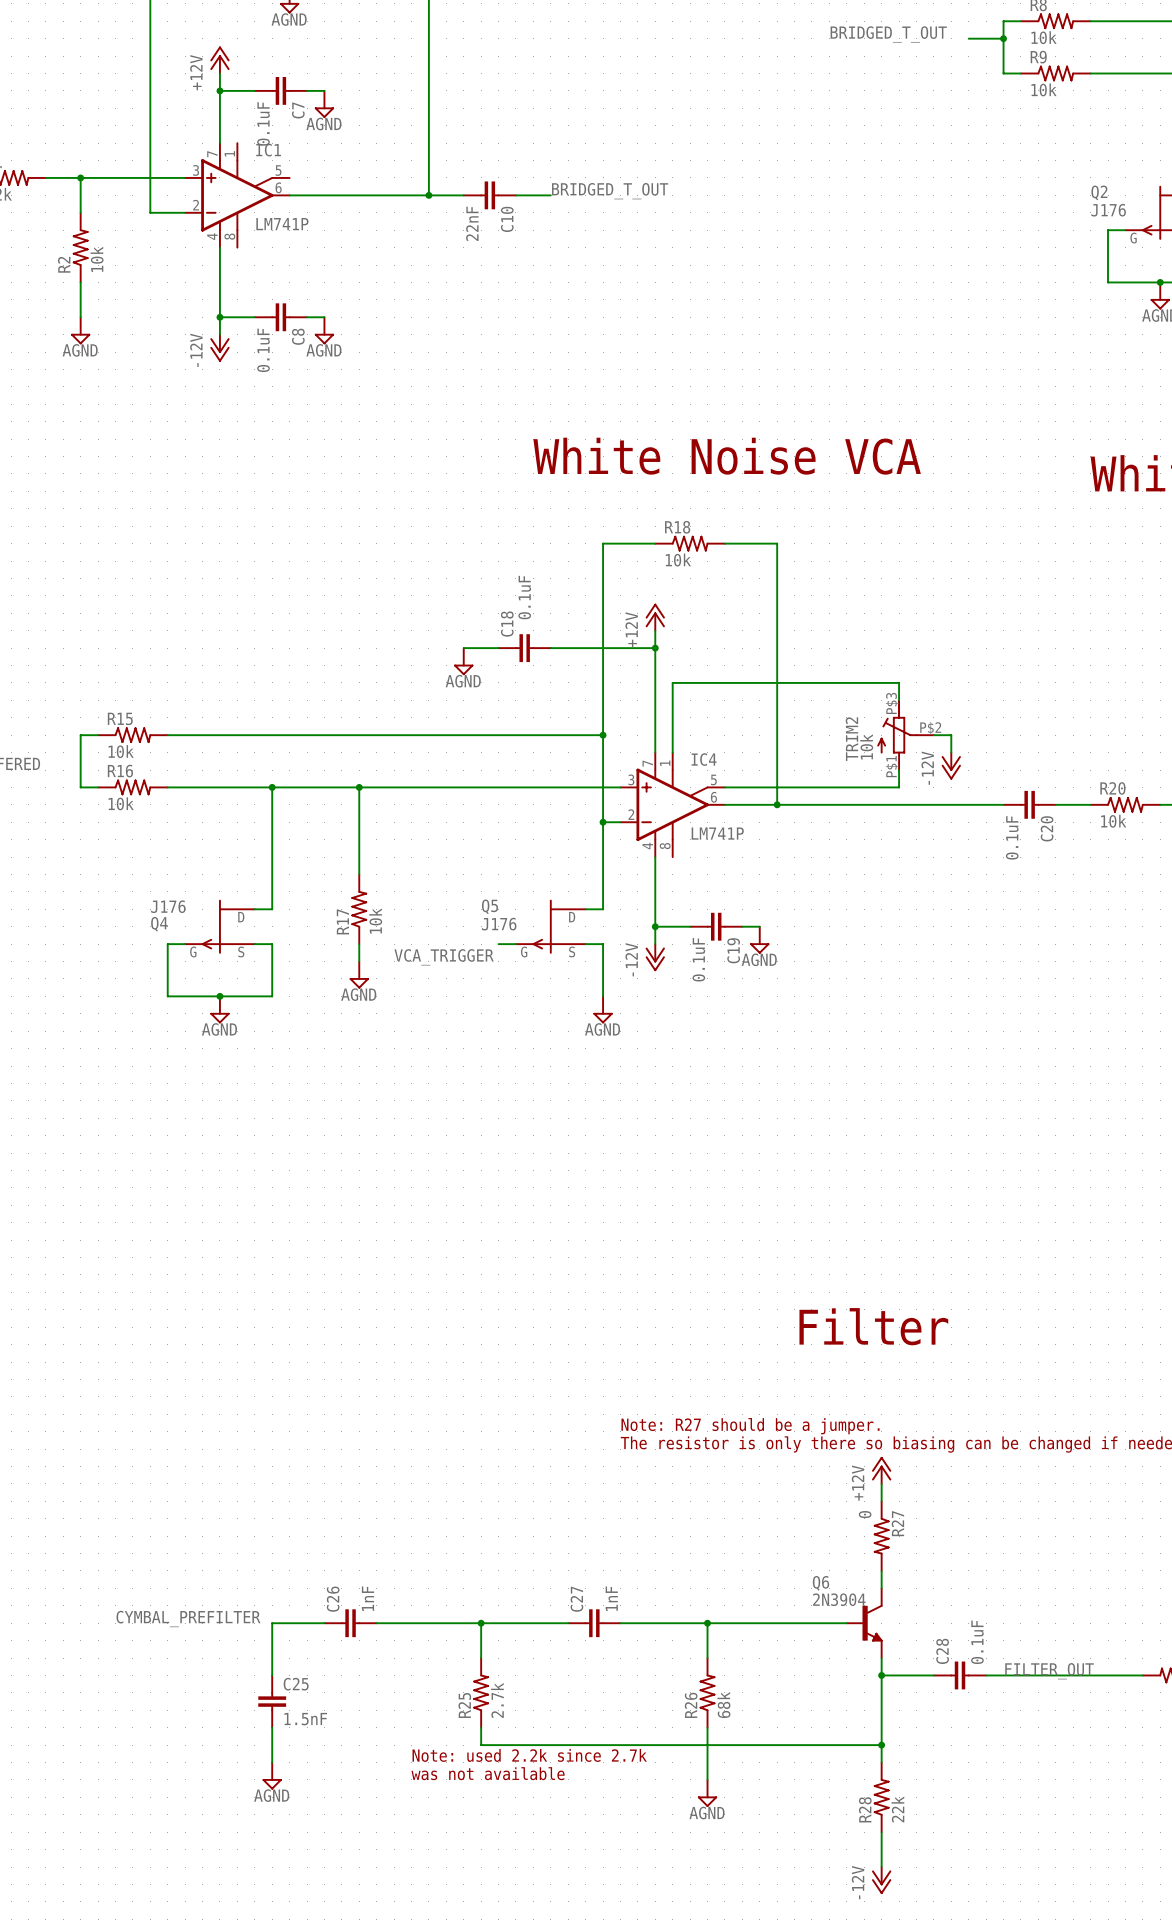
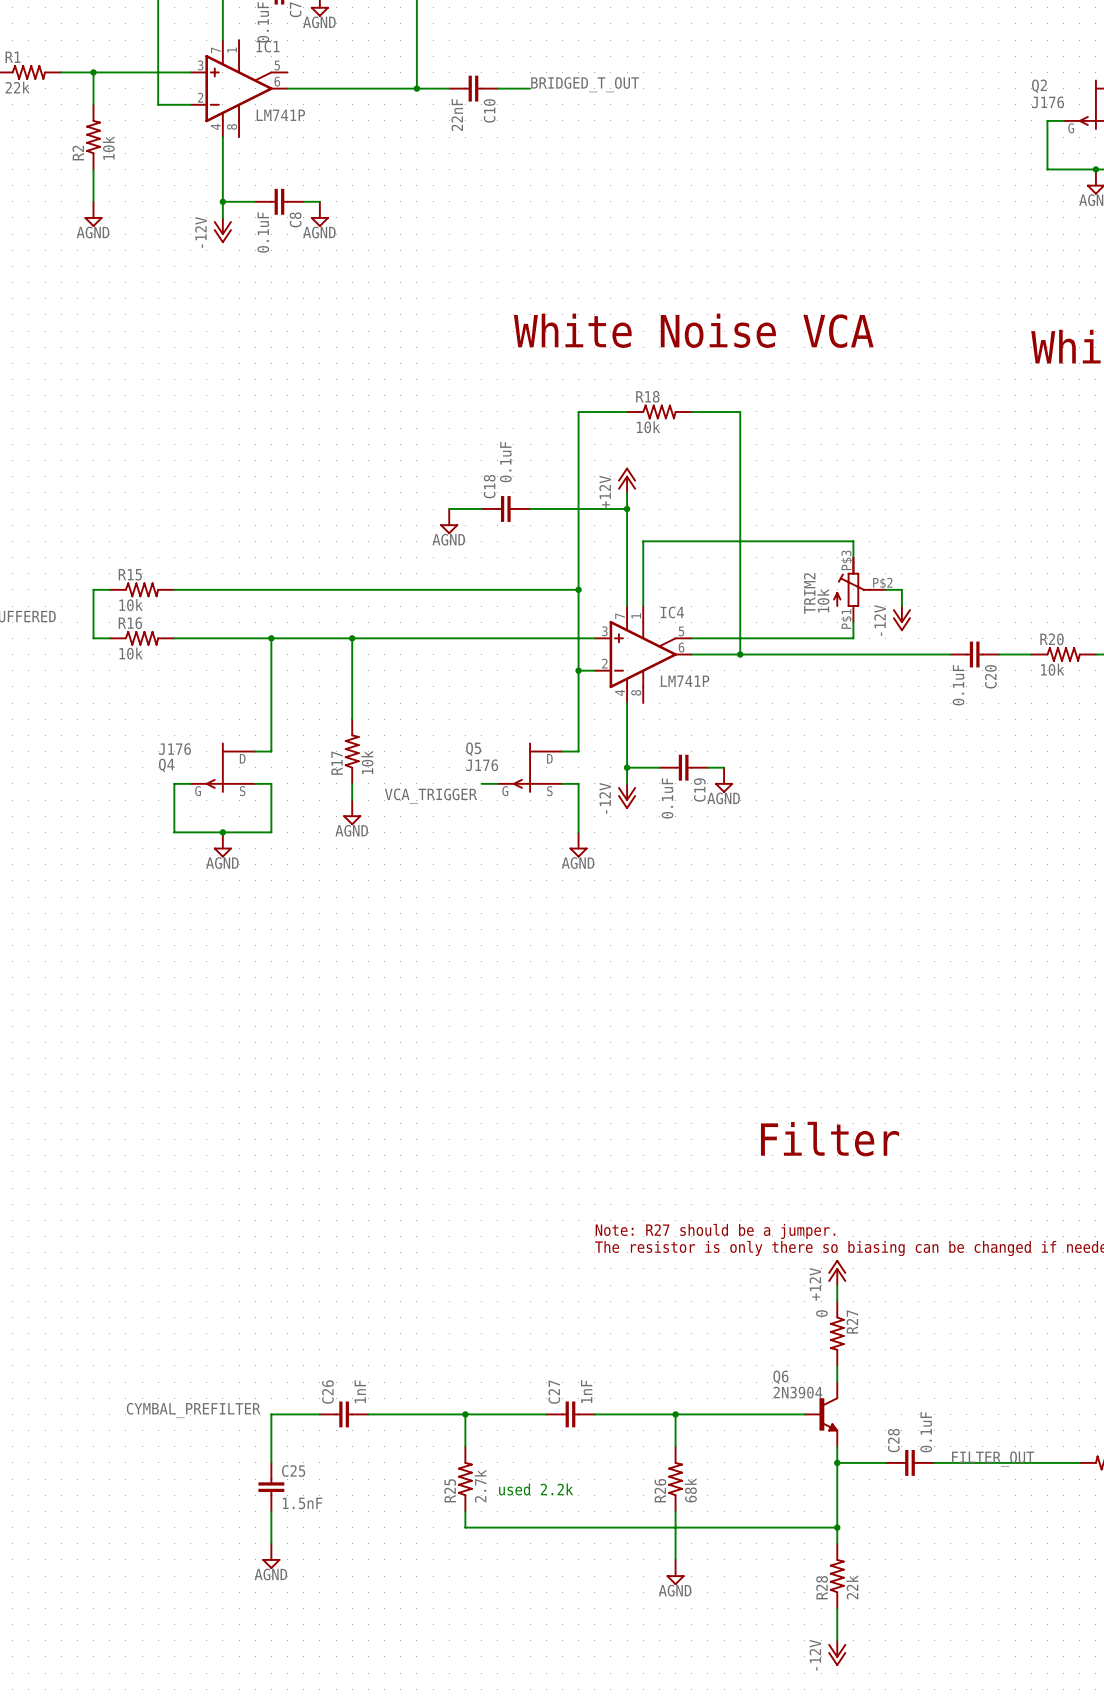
text: none -> used 2.2k (536, 1489)
text: Note: used 2.2k since 2.7k (529, 1755) -> none
text: was not available (488, 1773) -> none

